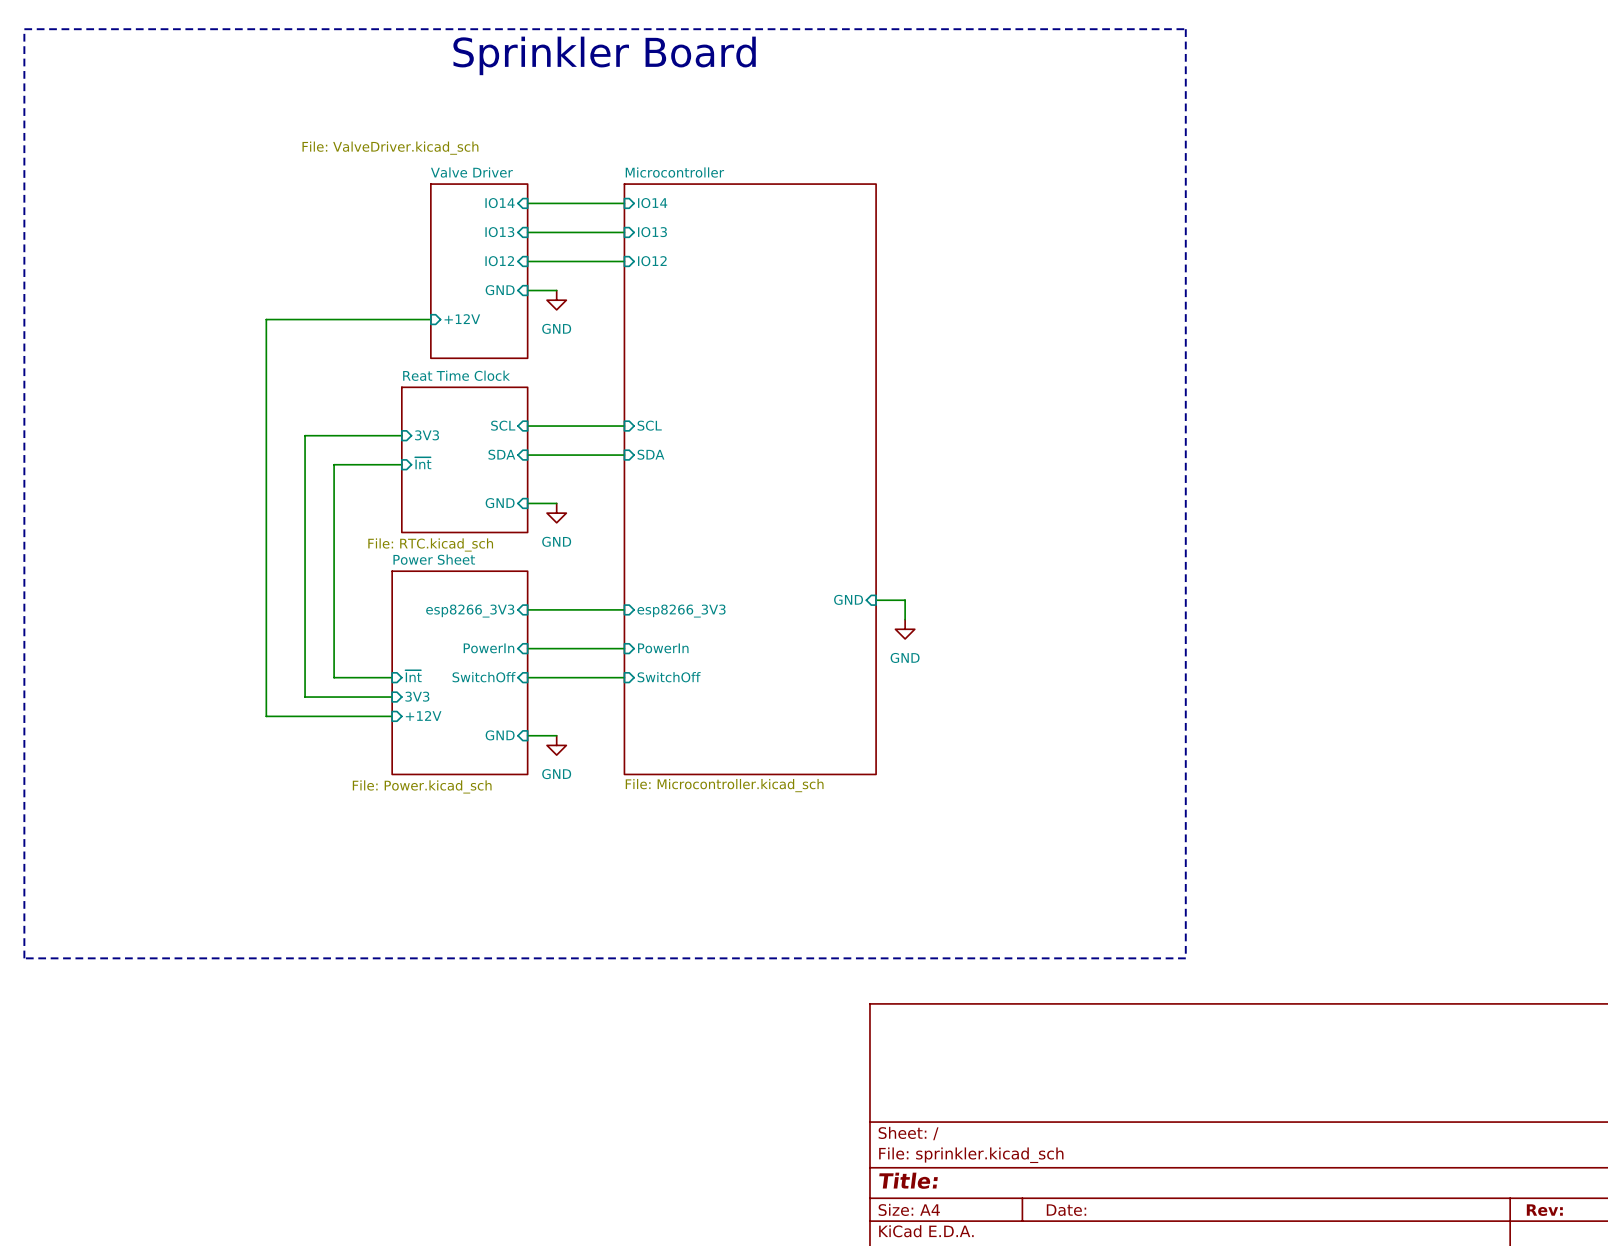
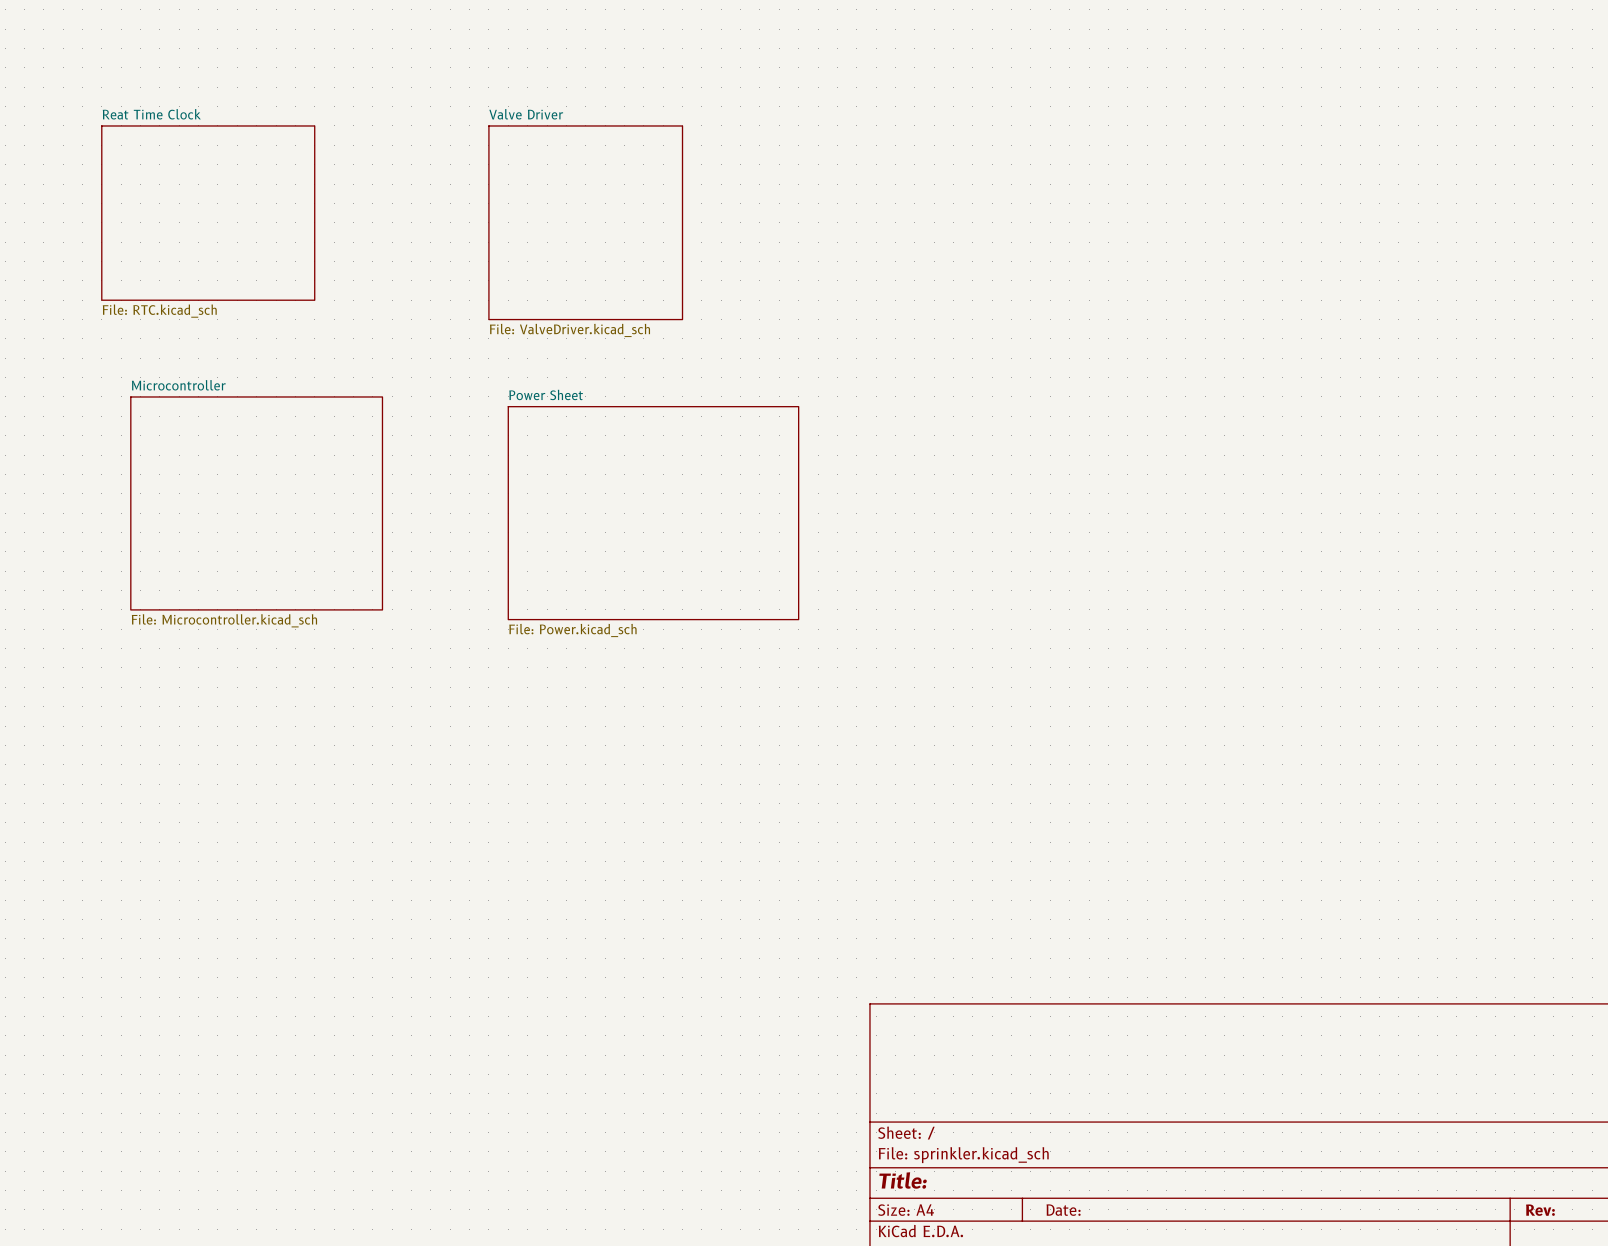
line: (24, 29) (1185, 29) (1185, 958) (24, 958) (24, 29) -> none
text: Sprinkler Board (604, 55) -> none
sheet pin: IO14 (500, 203) -> none
wire: (527, 203) (624, 203) -> none
sheet pin: IO14 (652, 203) -> none
sheet Reat Time Clock: none -> File: RTC.kicad_sch (208, 213)
sheet Valve Driver: none -> File: ValveDriver.kicad_sch (585, 222)
sheet pin: IO13 (499, 232) -> none
wire: (527, 232) (624, 232) -> none
sheet pin: IO13 (652, 232) -> none
sheet pin: IO12 (499, 261) -> none
wire: (527, 261) (624, 261) -> none
sheet pin: IO12 (652, 261) -> none
sheet Valve Driver: File: ValveDriver.kicad_sch (479, 271) -> none
sheet pin: GND (500, 290) -> none
wire: (527, 290) (556, 290) -> none
power symbol: GND (556, 300) -> none
wire: (430, 319) (266, 319) (266, 716) (392, 716) -> none
sheet pin: +12V (462, 319) -> none
sheet pin: SCL (503, 425) -> none
sheet pin: SCL (649, 425) -> none
wire: (527, 426) (624, 426) -> none
wire: (401, 435) (305, 435) (305, 697) (392, 697) -> none
sheet pin: 3V3 (427, 435) -> none
sheet pin: SDA (501, 454) -> none
sheet pin: SDA (650, 454) -> none
wire: (527, 455) (624, 455) -> none
sheet Reat Time Clock: File: RTC.kicad_sch (464, 459) -> none
sheet pin: ~{Int} (423, 463) -> none
wire: (401, 464) (334, 464) (334, 677) (392, 677) -> none
sheet Microcontroller: File: Microcontroller.kicad_sch (750, 479) -> none
sheet Microcontroller: none -> File: Microcontroller.kicad_sch (256, 503)
sheet pin: GND (500, 503) -> none
wire: (527, 503) (556, 503) -> none
power symbol: GND (556, 513) -> none
sheet Power Sheet: none -> File: Power.kicad_sch (653, 513)
sheet pin: GND (848, 599) -> none
wire: (876, 600) (905, 600) (905, 619) -> none
wire: (527, 609) (624, 609) -> none
sheet pin: esp8266_3V3 (470, 611) -> none
sheet pin: esp8266_3V3 (681, 611) -> none
power symbol: GND (905, 629) -> none
sheet pin: PowerIn (488, 648) -> none
wire: (527, 648) (624, 648) -> none
sheet pin: PowerIn (663, 648) -> none
sheet Power Sheet: File: Power.kicad_sch (459, 672) -> none
sheet pin: ~{Int} (413, 676) -> none
sheet pin: SwitchOff (484, 677) -> none
wire: (527, 677) (624, 677) -> none
sheet pin: SwitchOff (669, 677) -> none
sheet pin: 3V3 (417, 696) -> none
sheet pin: +12V (423, 715) -> none
sheet pin: GND (500, 735) -> none
wire: (527, 735) (556, 735) -> none
power symbol: GND (556, 745) -> none

